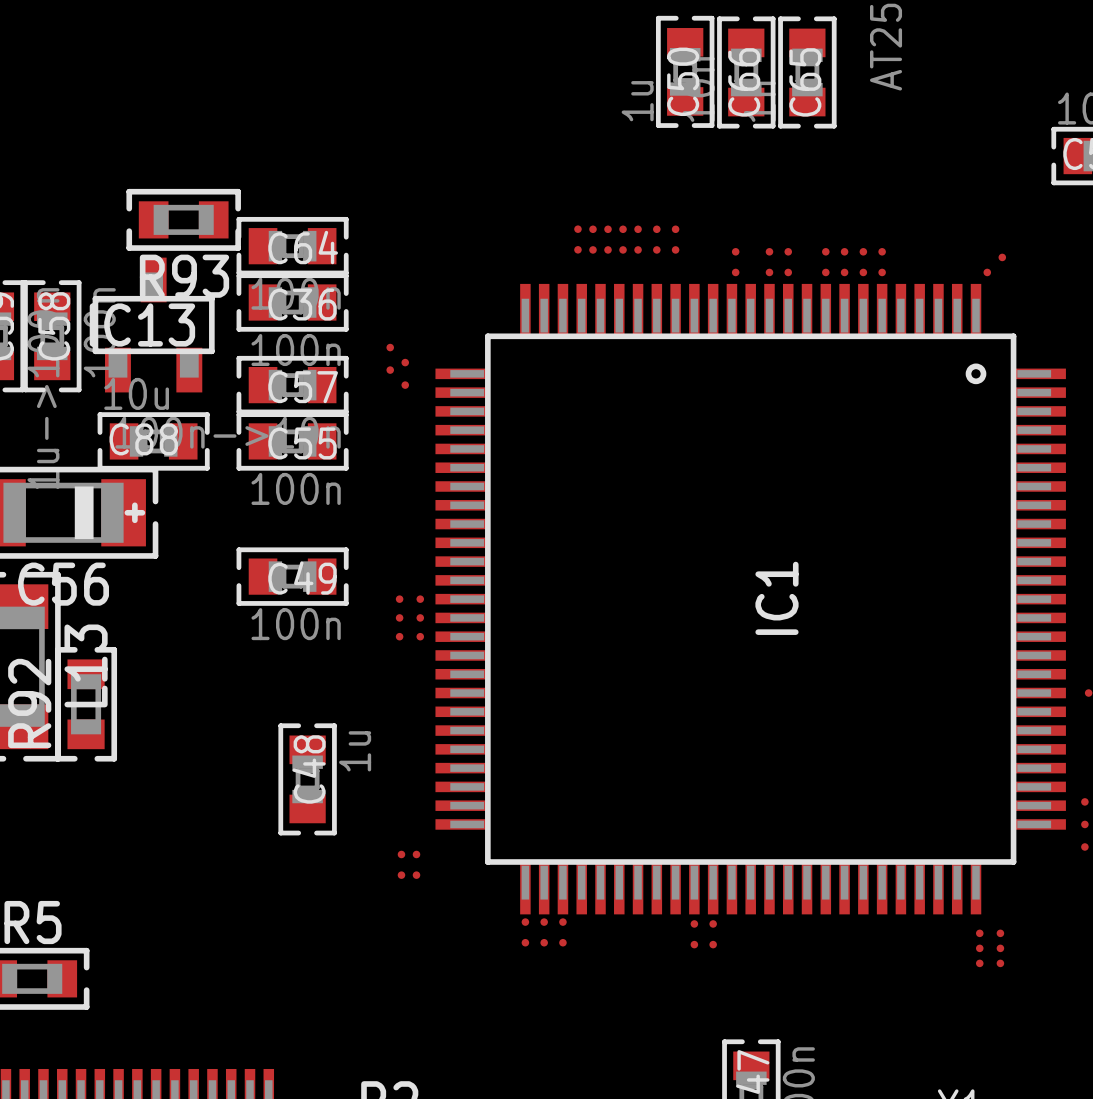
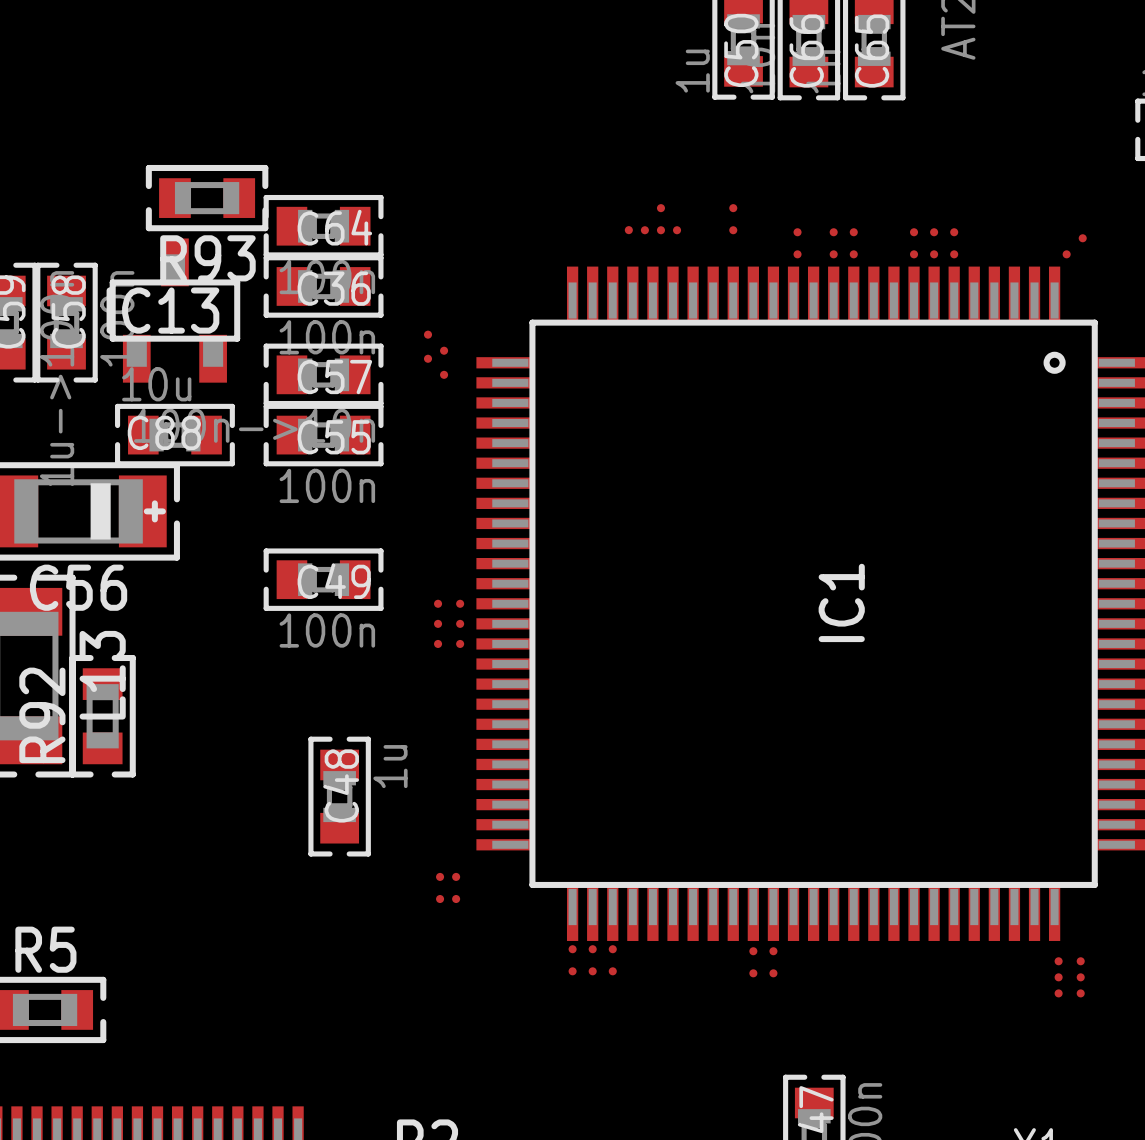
part: (577, 229) -> none
part: (592, 229) -> none
part: (623, 229) -> none
part: (638, 229) -> none
part: (656, 229) -> none
part: (638, 249) -> none
part: (656, 249) -> none
part: (825, 251) -> none
part: (825, 272) -> none

